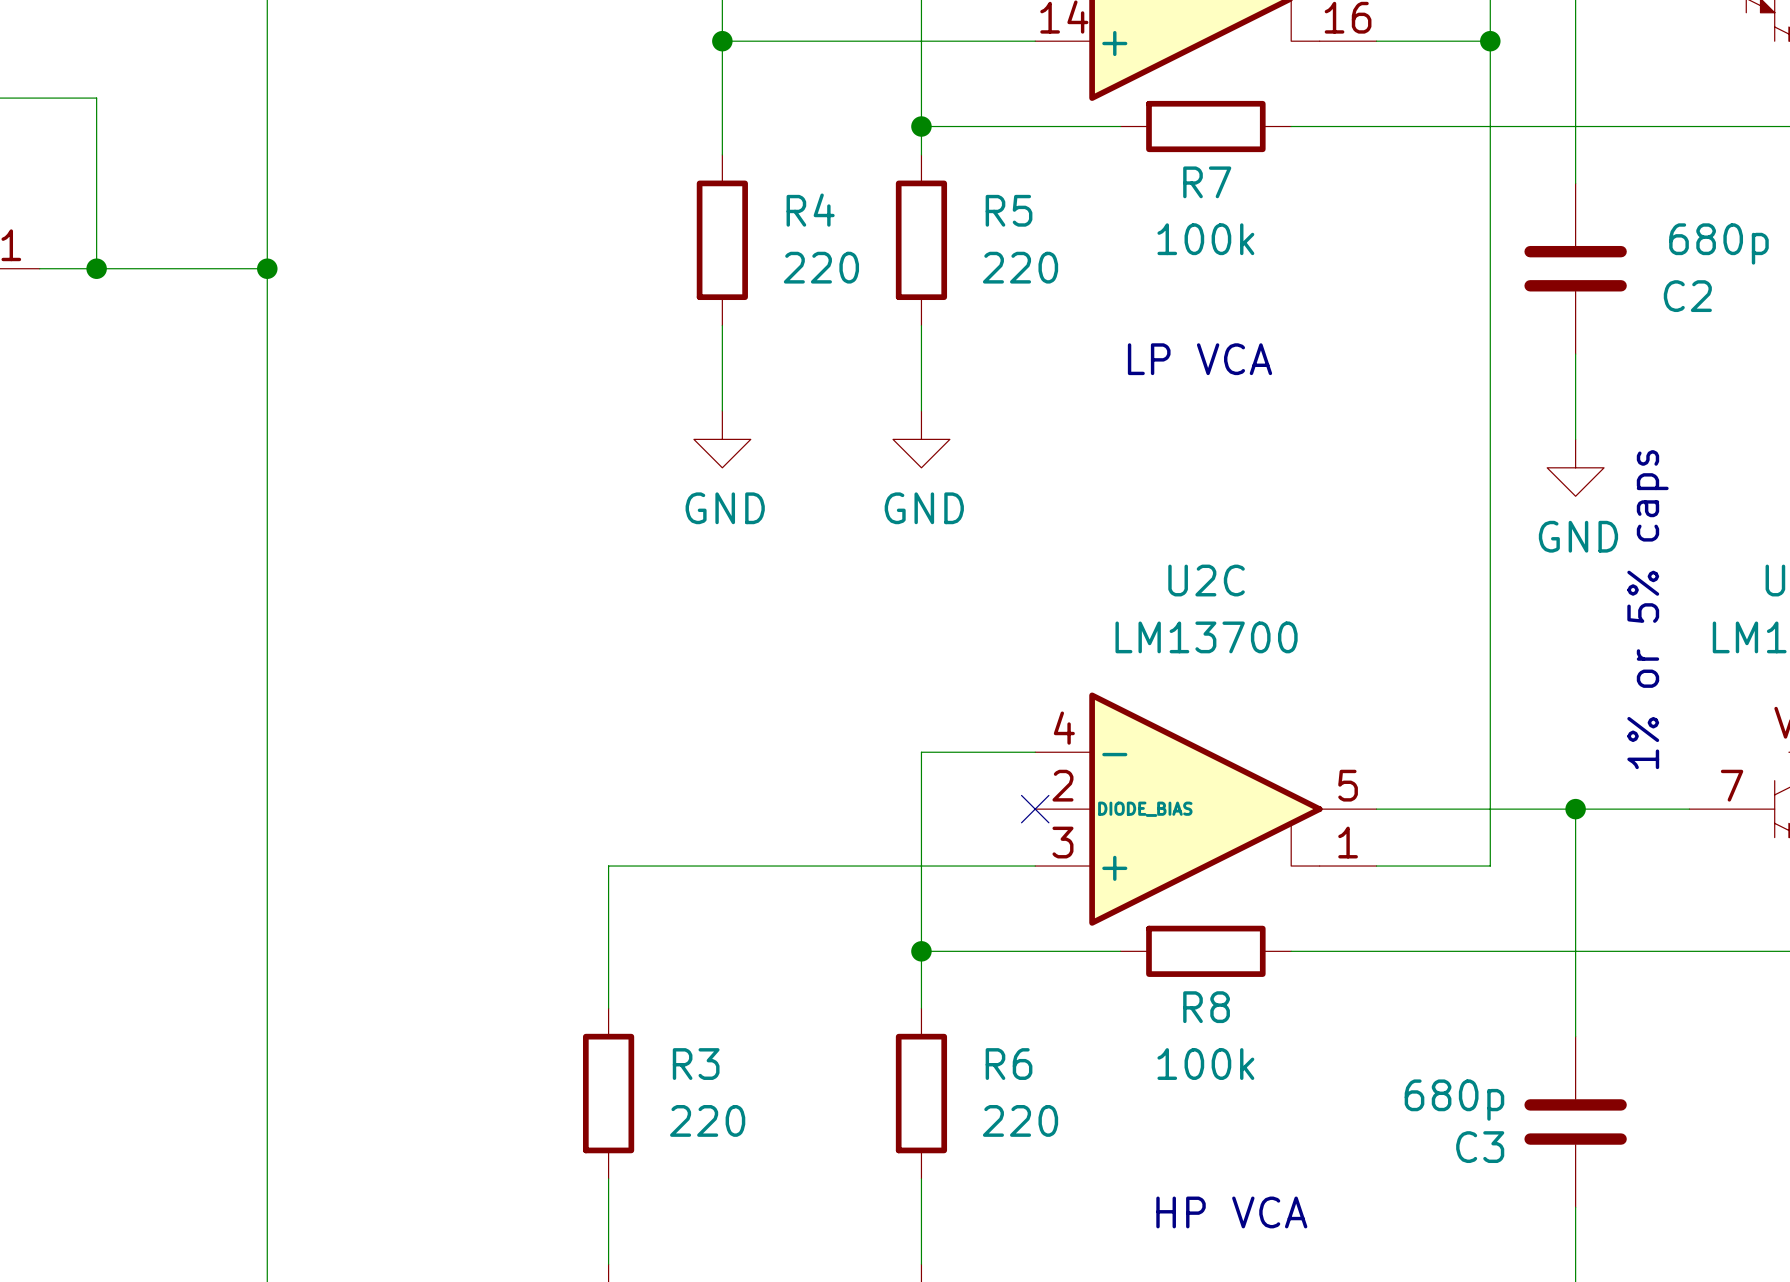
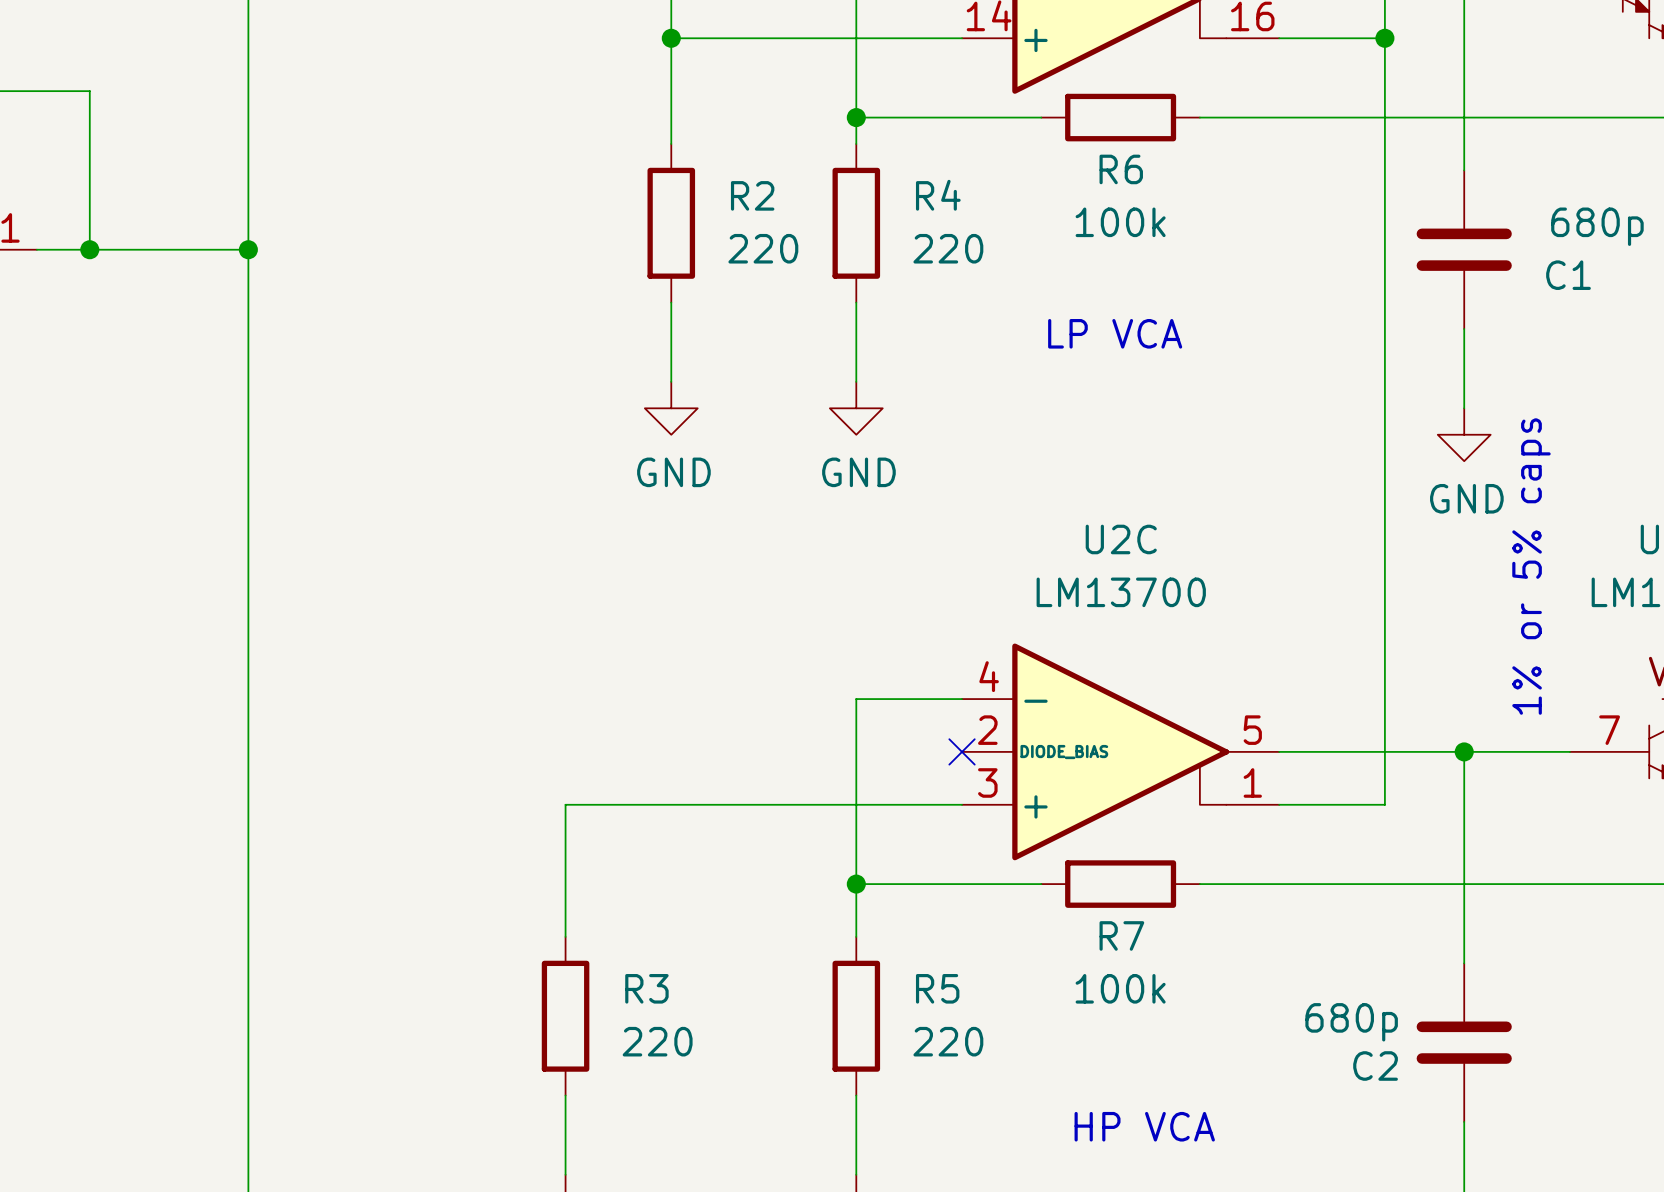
R7 name: R7 (1207, 182) -> R6 (1121, 169)
R4 name: R4 (810, 210) -> R2 (752, 195)
R5 name: R5 (1009, 210) -> R4 (938, 195)
C2 name: C2 (1687, 296) -> C1 (1568, 275)
R8 name: R8 (1206, 1007) -> R7 (1121, 935)
R6 name: R6 (1009, 1064) -> R5 (937, 988)
C3 name: C3 (1480, 1147) -> C2 (1375, 1065)

